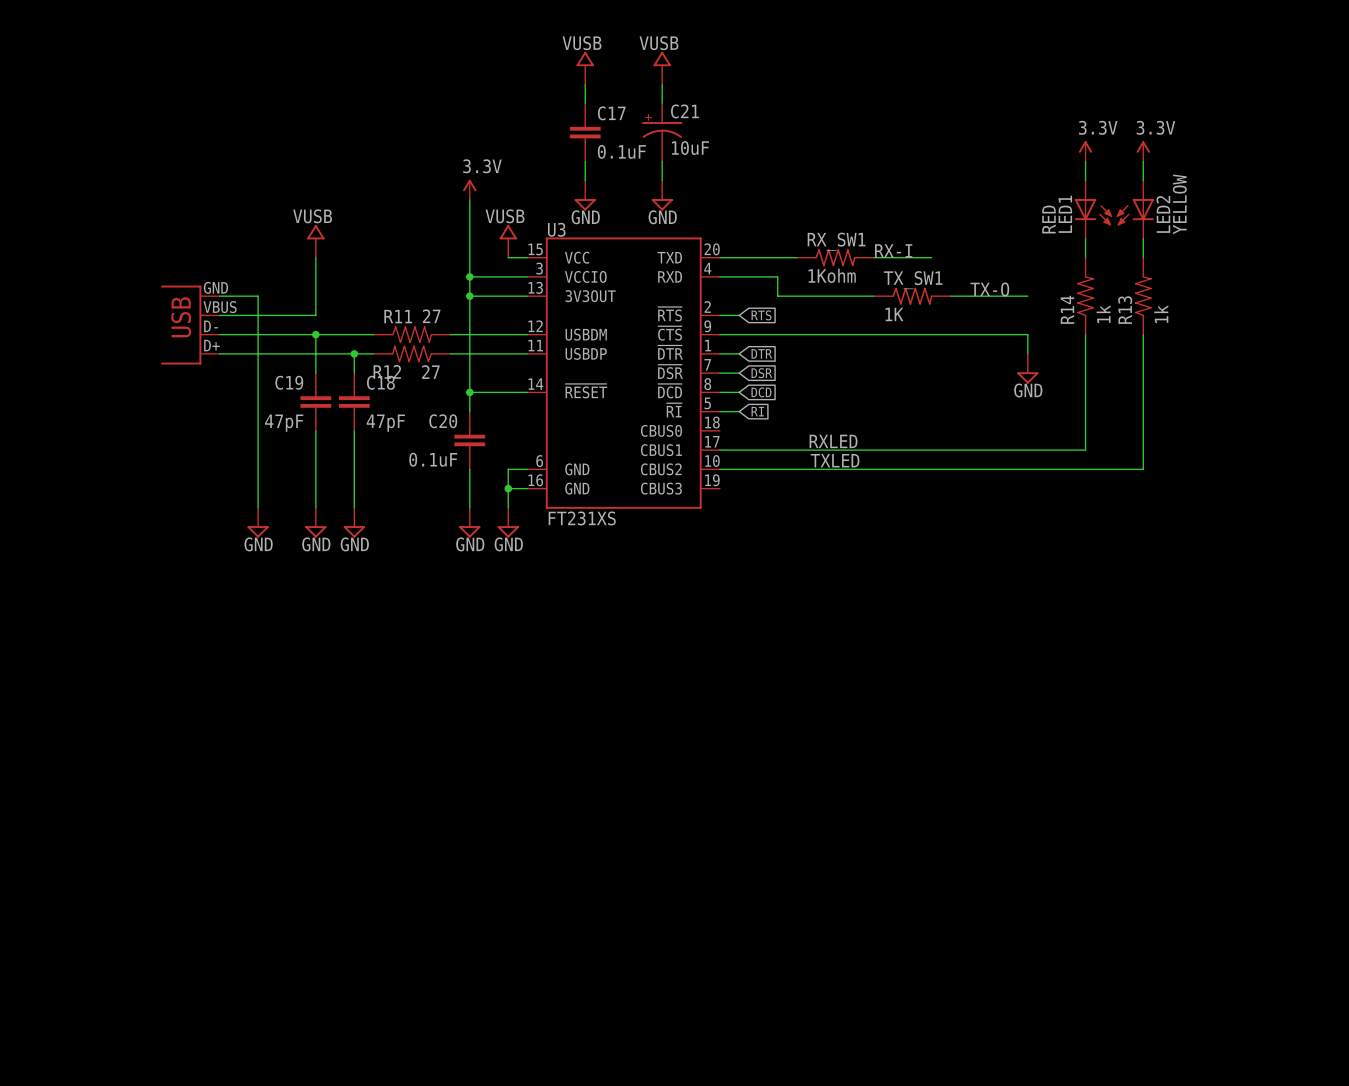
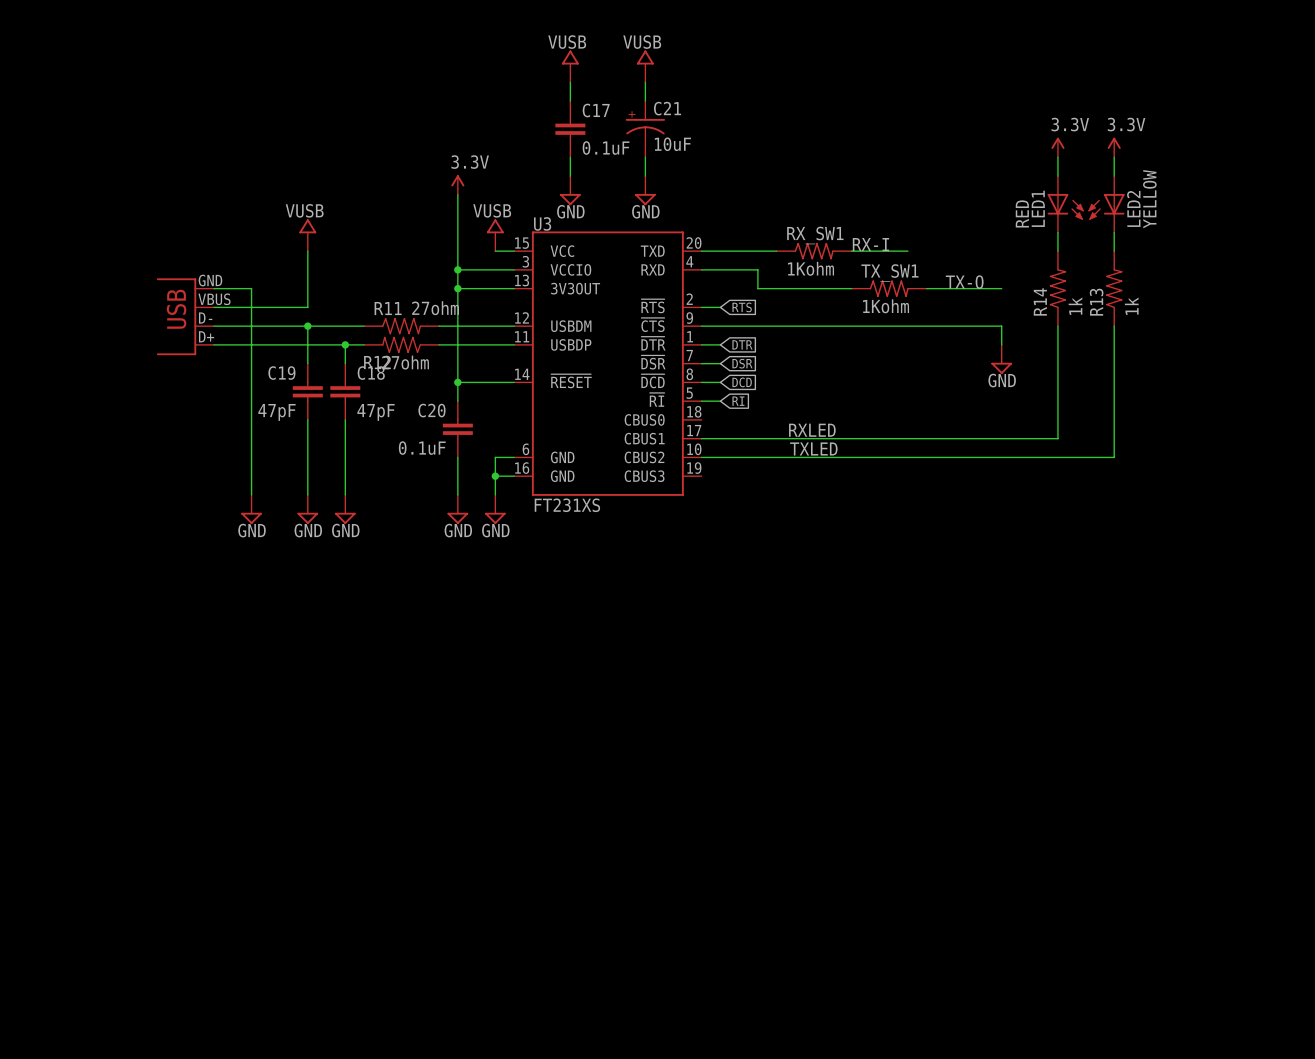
TX_SW1 value: 1K (894, 314) -> 1Kohm (886, 306)
R11 value: 27 (431, 316) -> 27ohm (435, 308)
R12 value: 27 (430, 372) -> 27ohm (405, 362)

